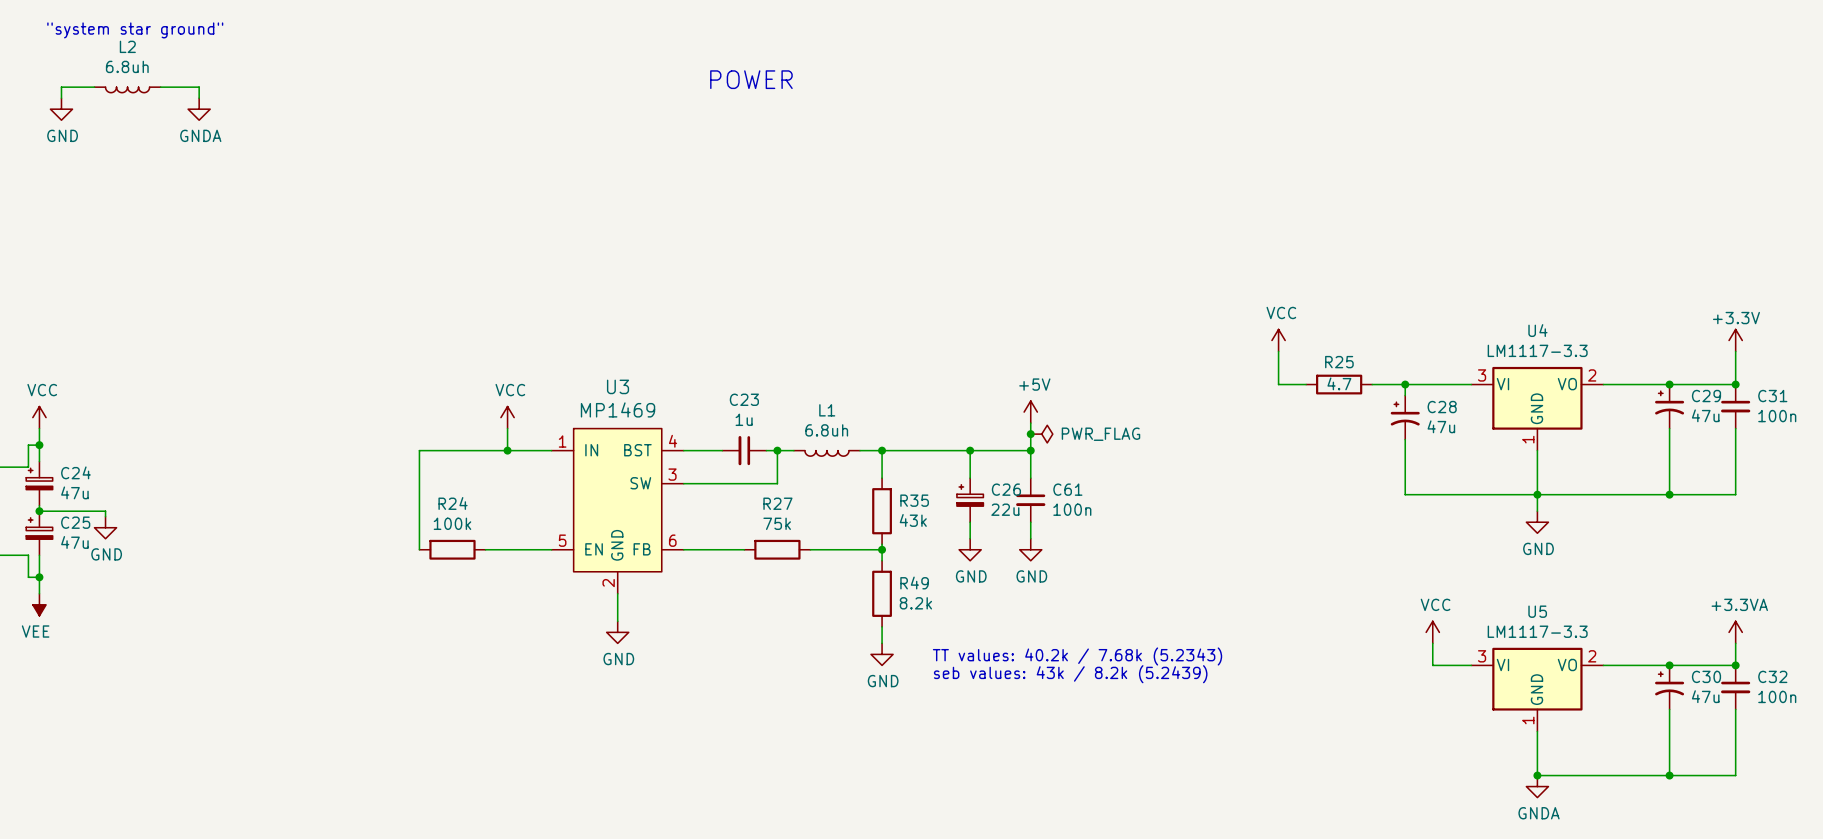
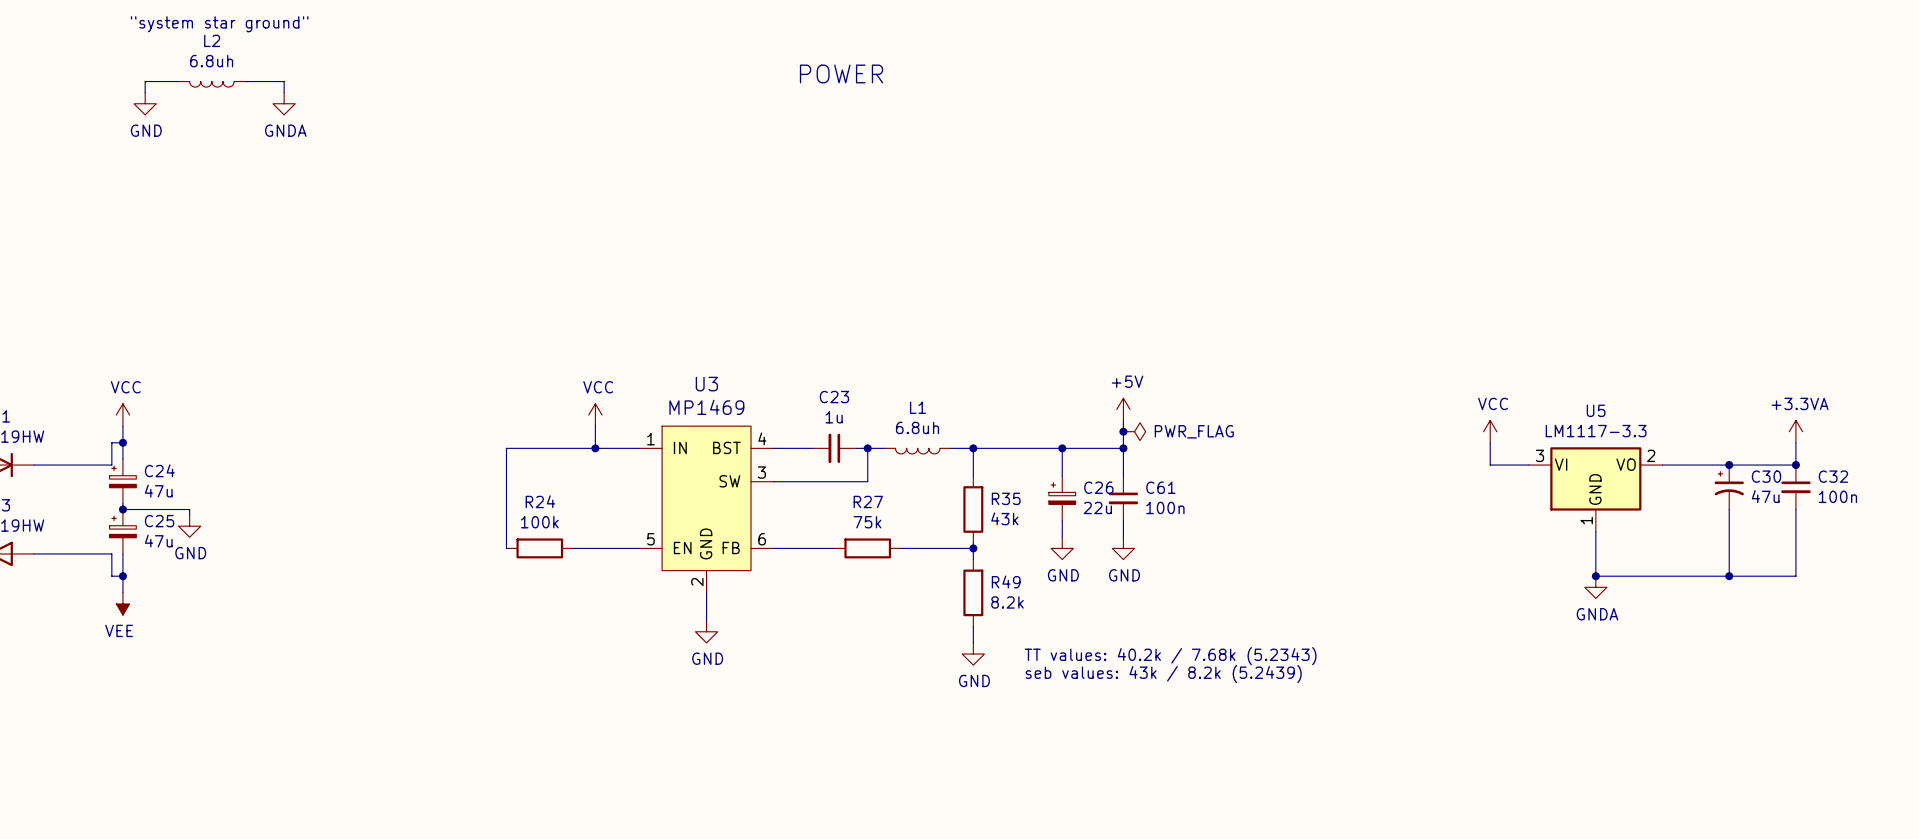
power symbol: VCC (1278, 340) -> none
power symbol: +3.3V (1735, 340) -> none
wire: (1278, 351) (1278, 384) (1306, 384) -> none
wire: (1735, 351) (1735, 384) (1603, 384) -> none
R25: 4.7 (1339, 384) -> none
wire: (1372, 384) (1471, 384) -> none
wire: (1405, 384) (1405, 395) -> none
junction: (1405, 384) -> none
junction: (1669, 384) -> none
junction: (1735, 384) -> none
C29: 47u (1669, 406) -> none
C31: 100n (1735, 406) -> none
U4: LM1117-3.3 (1537, 408) -> none
C28: 47u (1405, 417) -> none
wire: (1669, 428) (1669, 494) -> none
wire: (1735, 428) (1735, 494) (1405, 494) (1405, 439) -> none
power symbol: none -> VCC (1490, 431)
junction: none -> (1729, 465)
junction: none -> (1795, 465)
junction: (1537, 494) -> none
junction: (1669, 494) -> none
power symbol: GND (1537, 522) -> none
junction: none -> (1595, 576)
junction: none -> (1729, 576)
power symbol: VCC (1432, 632) -> none
power symbol position: +3.3VA (1735, 632) -> +3.3VA (1795, 431)
wire: (1432, 643) (1432, 665) (1471, 665) -> (1490, 442) (1490, 465) (1529, 465)
wire: (1735, 643) (1735, 665) (1603, 665) -> (1795, 442) (1795, 465) (1662, 465)
junction: (1669, 665) -> none
junction: (1735, 665) -> none
C30 position: (1669, 687) -> (1729, 487)
C32 position: (1735, 687) -> (1795, 487)
U5 position: (1537, 689) -> (1595, 489)
wire: (1669, 709) (1669, 775) -> (1729, 509) (1729, 576)
wire: (1735, 709) (1735, 775) (1537, 775) (1537, 731) -> (1795, 509) (1795, 576) (1595, 576) (1595, 531)
junction: (1537, 775) -> none
junction: (1669, 775) -> none
power symbol position: GNDA (1537, 786) -> GNDA (1595, 587)

